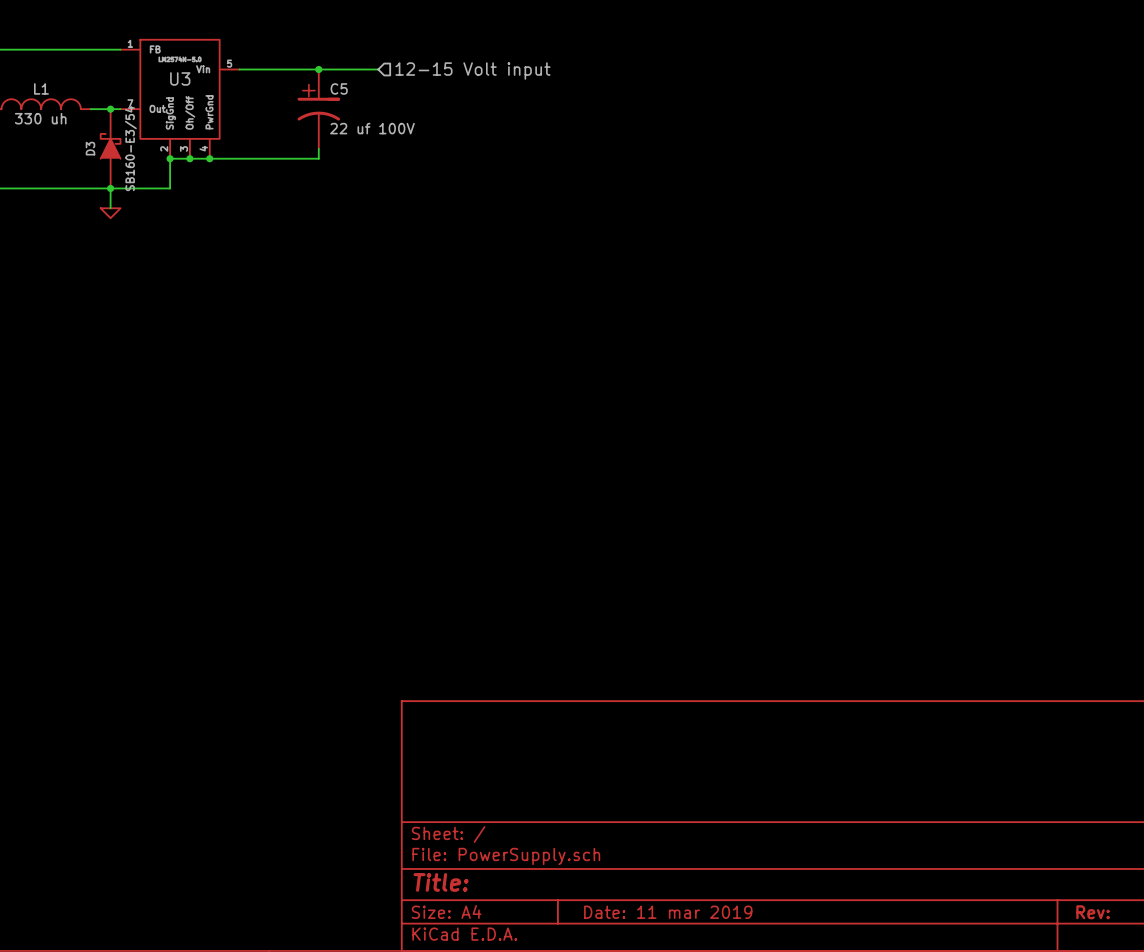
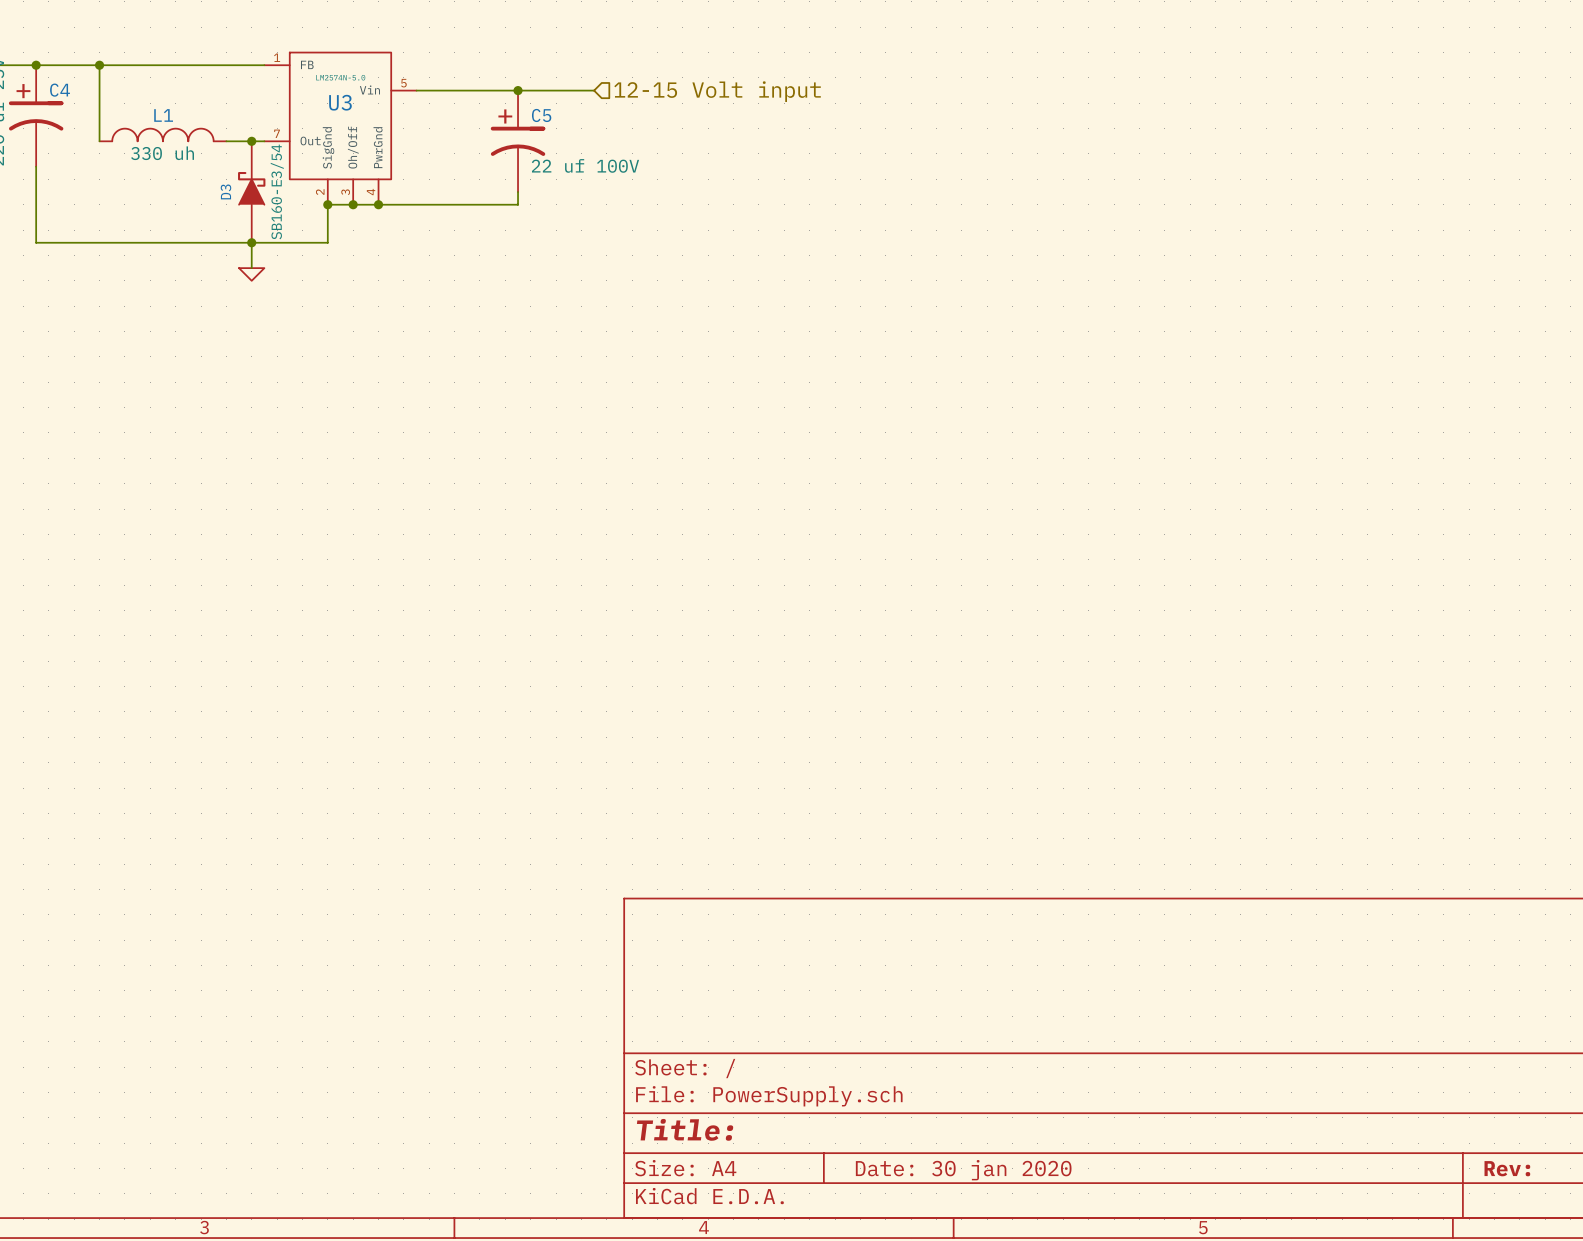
title block: Date: 11 mar 2019 (668, 912) -> Date: 30 jan 2020 (963, 1170)

